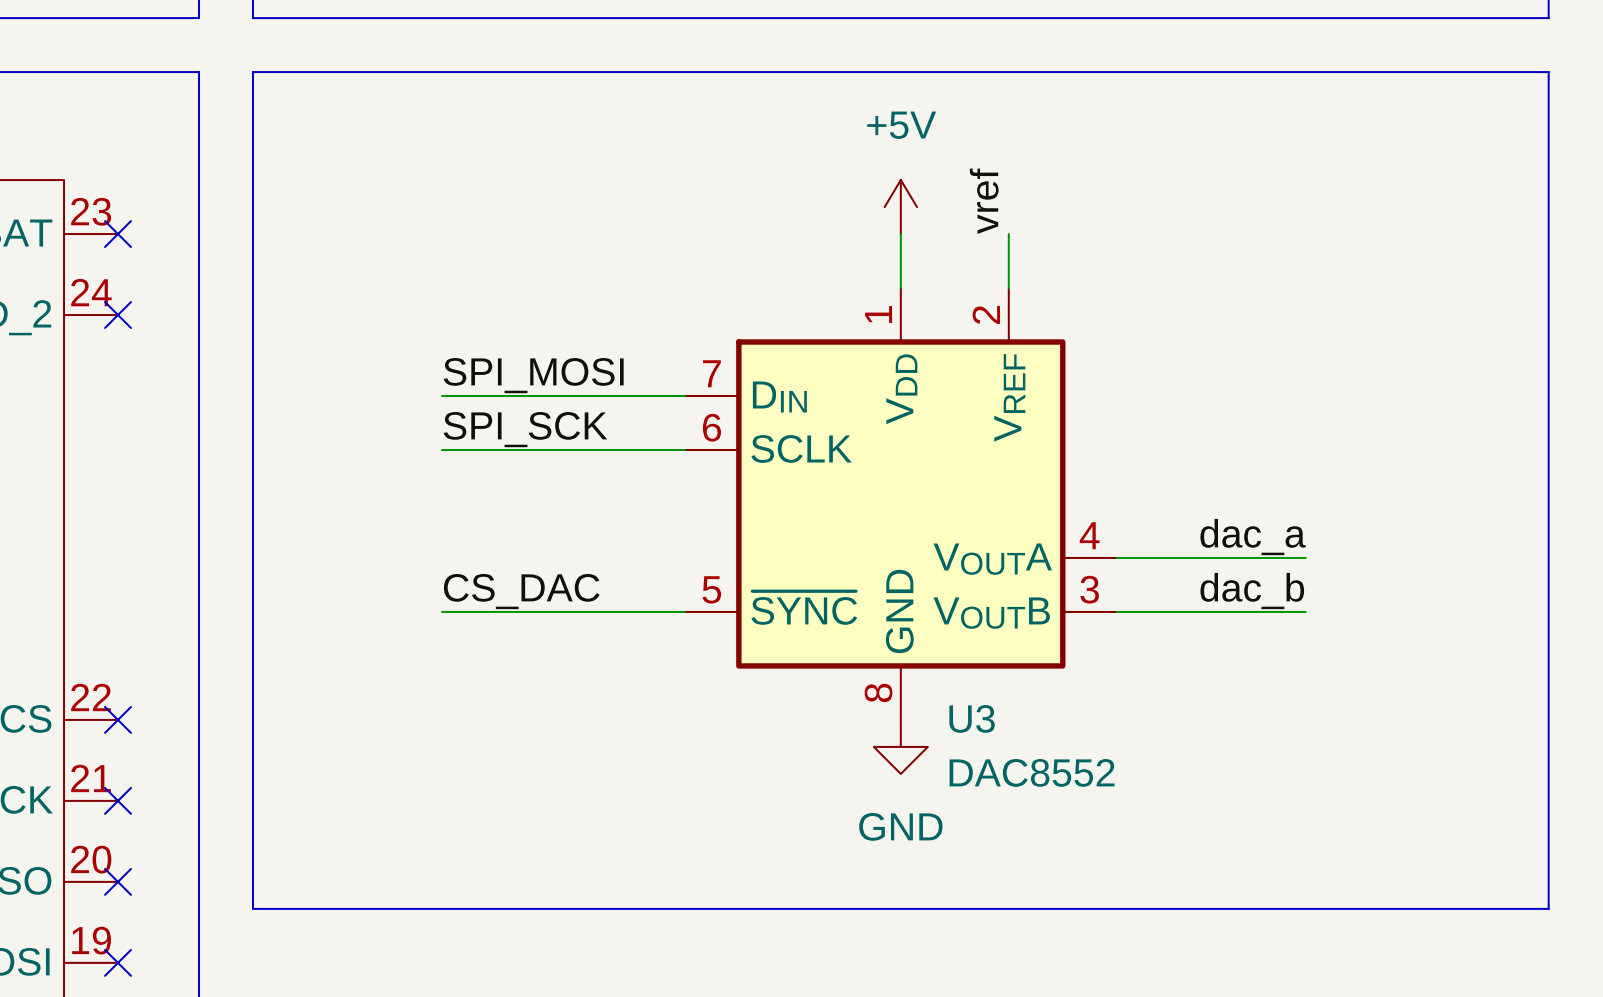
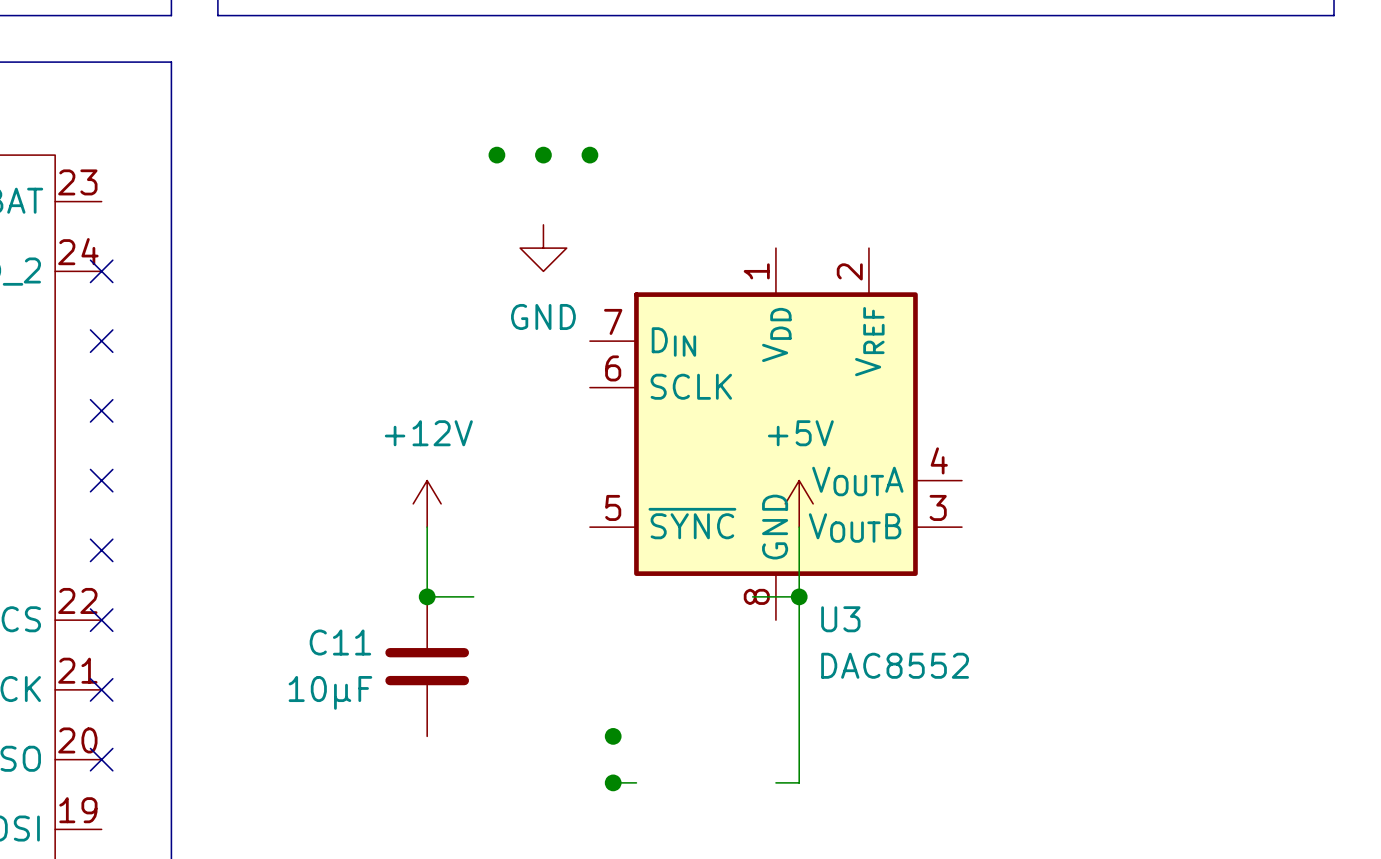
line: (252, 72) (252, 908) (1548, 908) (1548, 72) (252, 72) -> none
junction: none -> (496, 155)
junction: none -> (543, 155)
junction: none -> (589, 155)
label: vref (984, 201) -> none
power symbol position: +5V (900, 207) -> +5V (799, 503)
no-connect mark: (118, 234) -> none
wire: (900, 234) (900, 288) -> none
wire: (1008, 234) (1008, 288) -> none
power symbol: none -> GND (543, 248)
label: SPI_MOSI (533, 375) -> none
no-connect mark: none -> (101, 341)
wire: (441, 396) (684, 396) -> none
label: SPI_SCK (525, 429) -> none
wire: (441, 449) (684, 449) -> none
no-connect mark: none -> (101, 410)
label: dac_a (1253, 537) -> none
no-connect mark: none -> (101, 480)
wire: (1116, 557) (1305, 557) -> none
power symbol: none -> +12V (427, 503)
label: CS_DAC (521, 591) -> none
label: dac_b (1252, 591) -> none
wire: (441, 611) (684, 611) -> none
wire: none -> (427, 527) (427, 596) (473, 596)
wire: none -> (799, 527) (799, 782) (775, 782)
wire: (1116, 611) (1305, 611) -> none
no-connect mark: none -> (101, 550)
junction: none -> (427, 596)
wire: none -> (752, 596) (799, 596)
junction: none -> (799, 596)
power symbol: GND (900, 746) -> none
C11: none -> 10µF (427, 666)
junction: none -> (613, 736)
junction: none -> (613, 782)
no-connect mark: (118, 962) -> none

